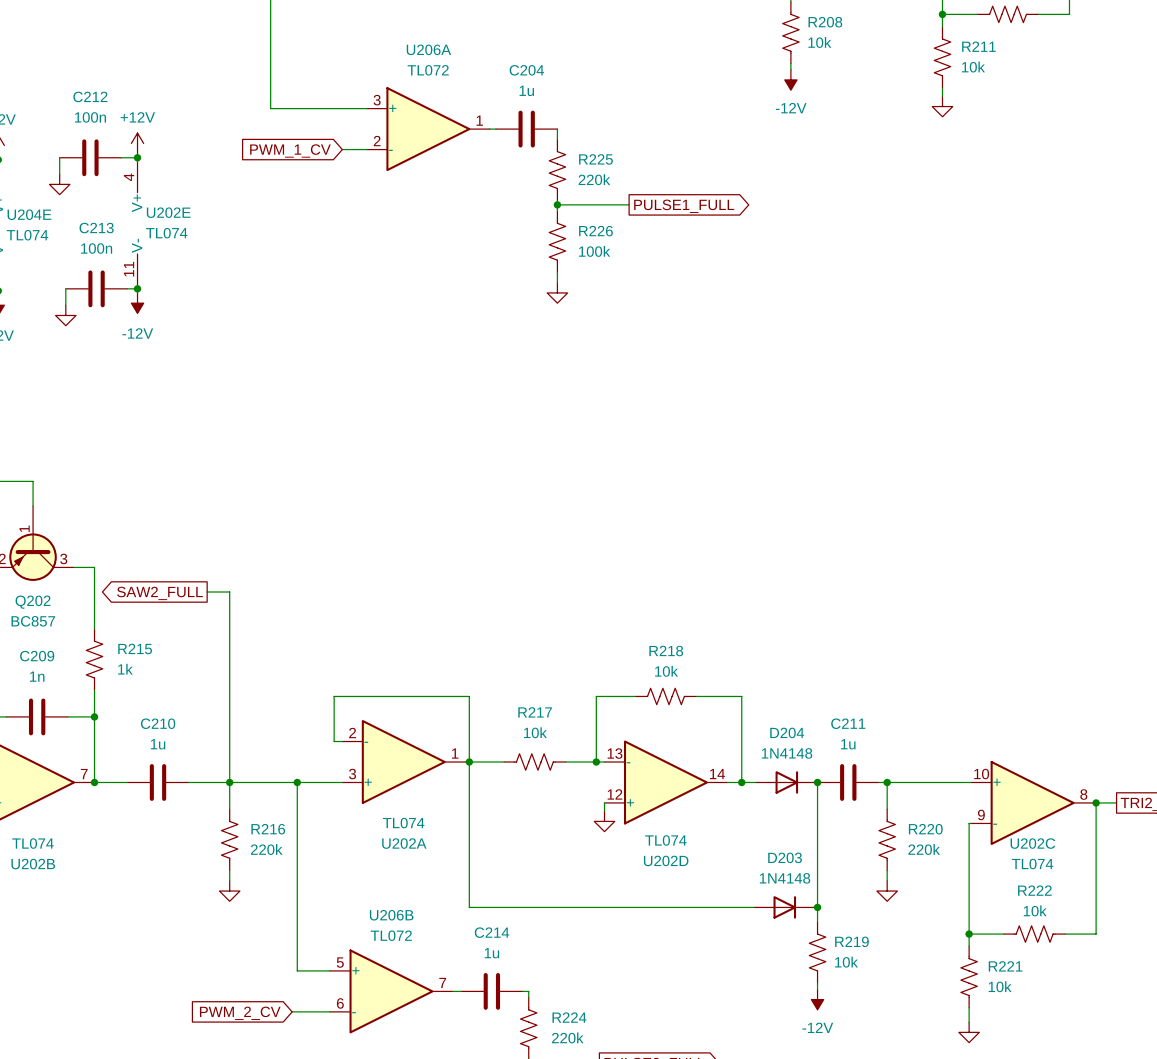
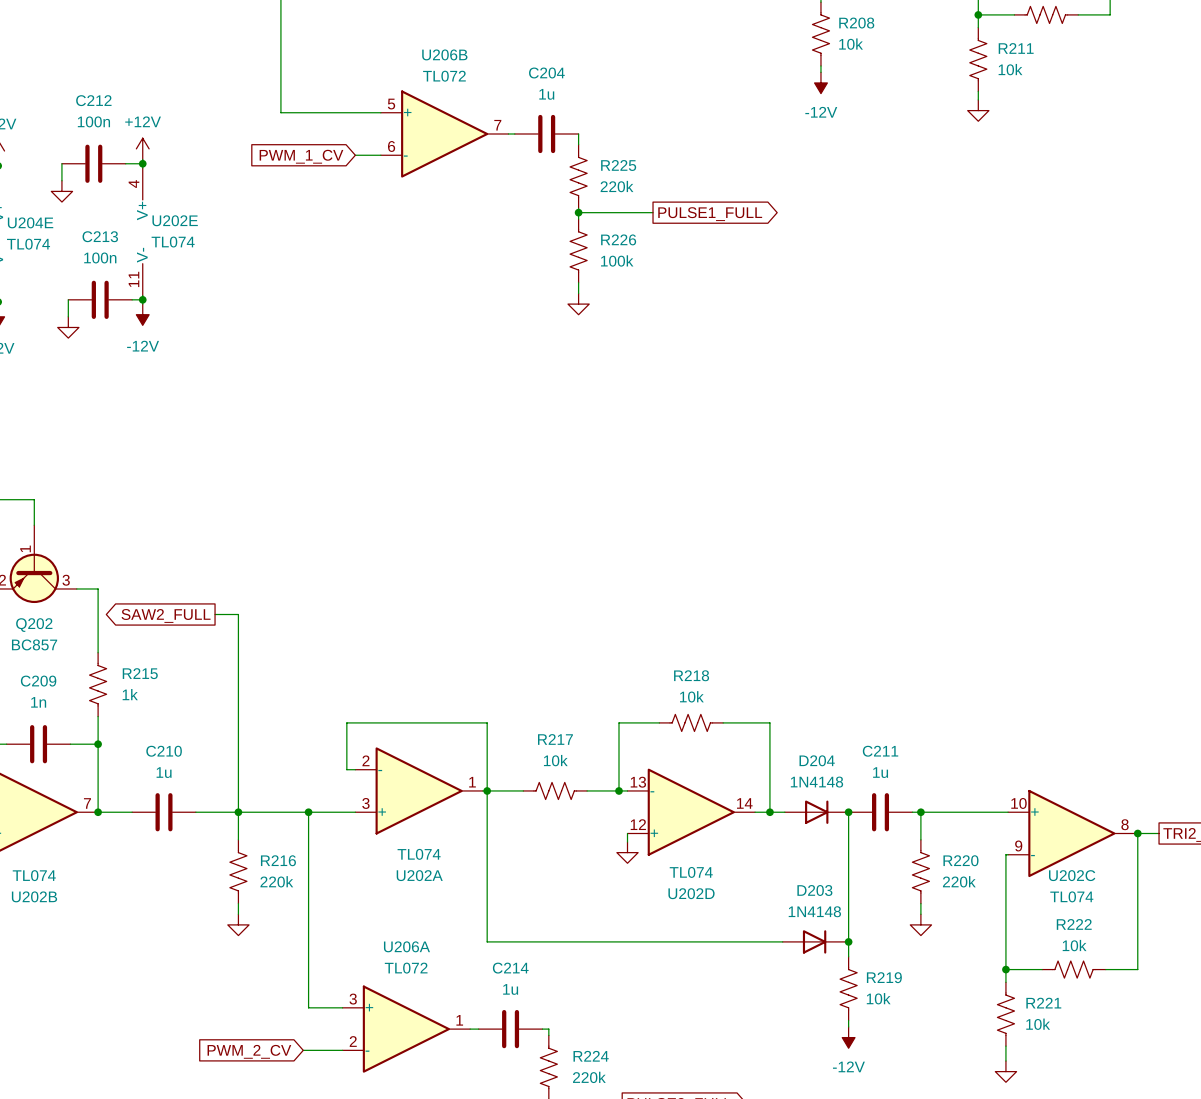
U206A position: (428, 129) -> (406, 1029)
U206B position: (391, 991) -> (444, 133)

